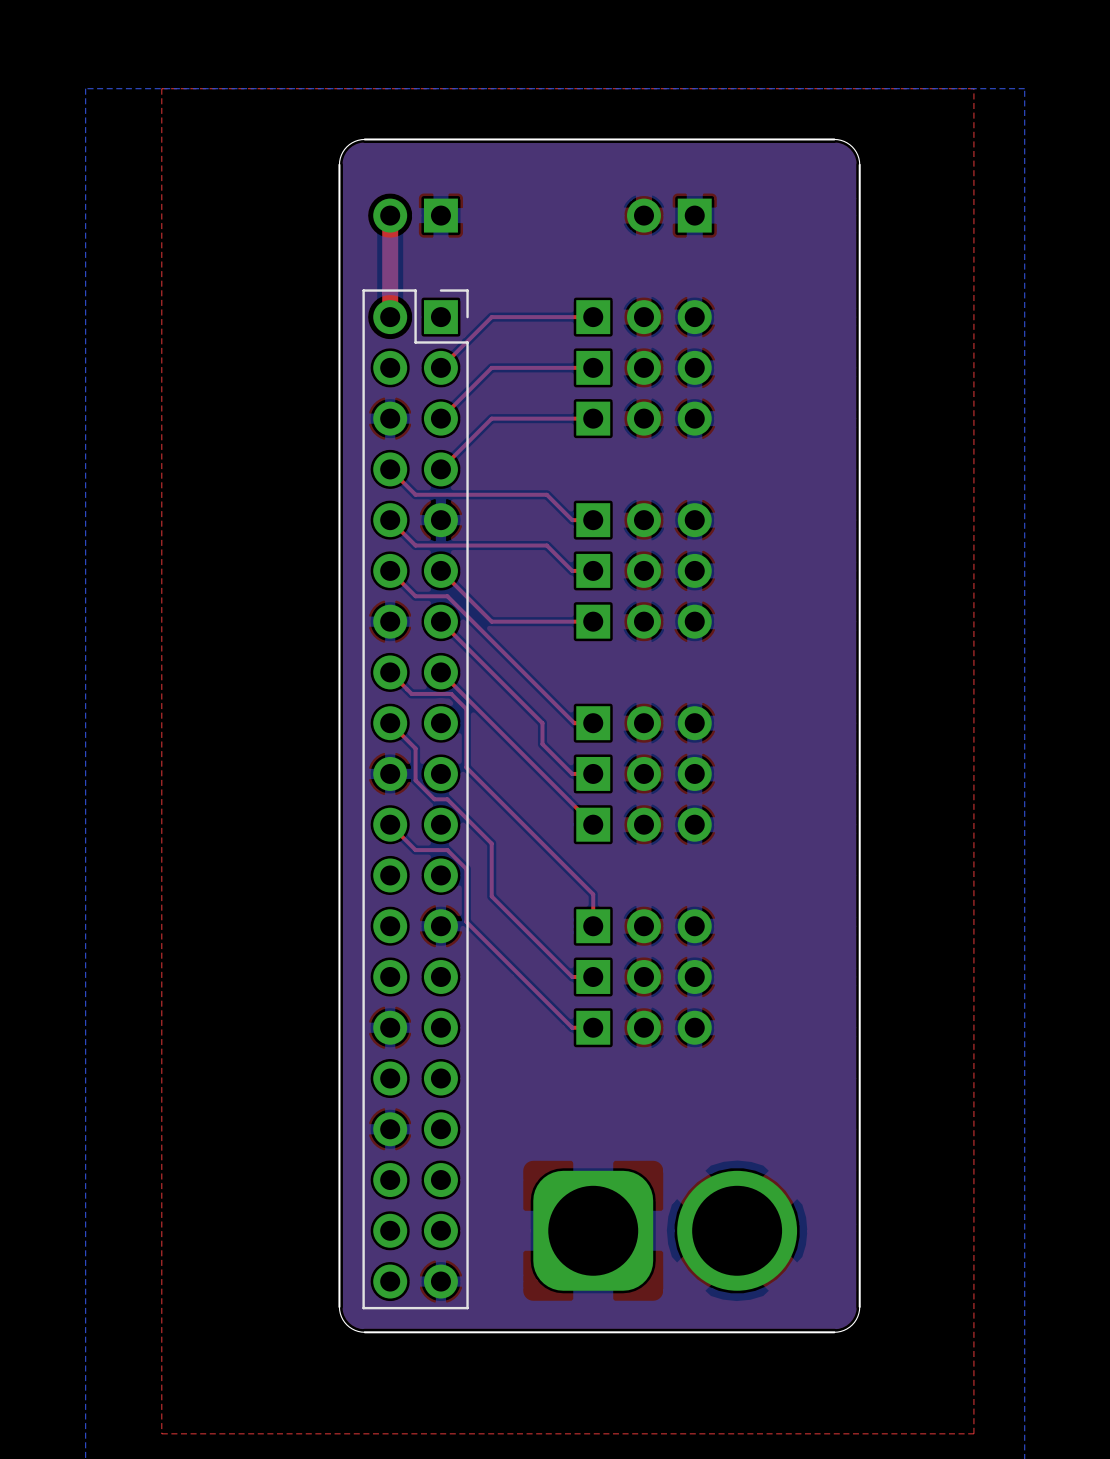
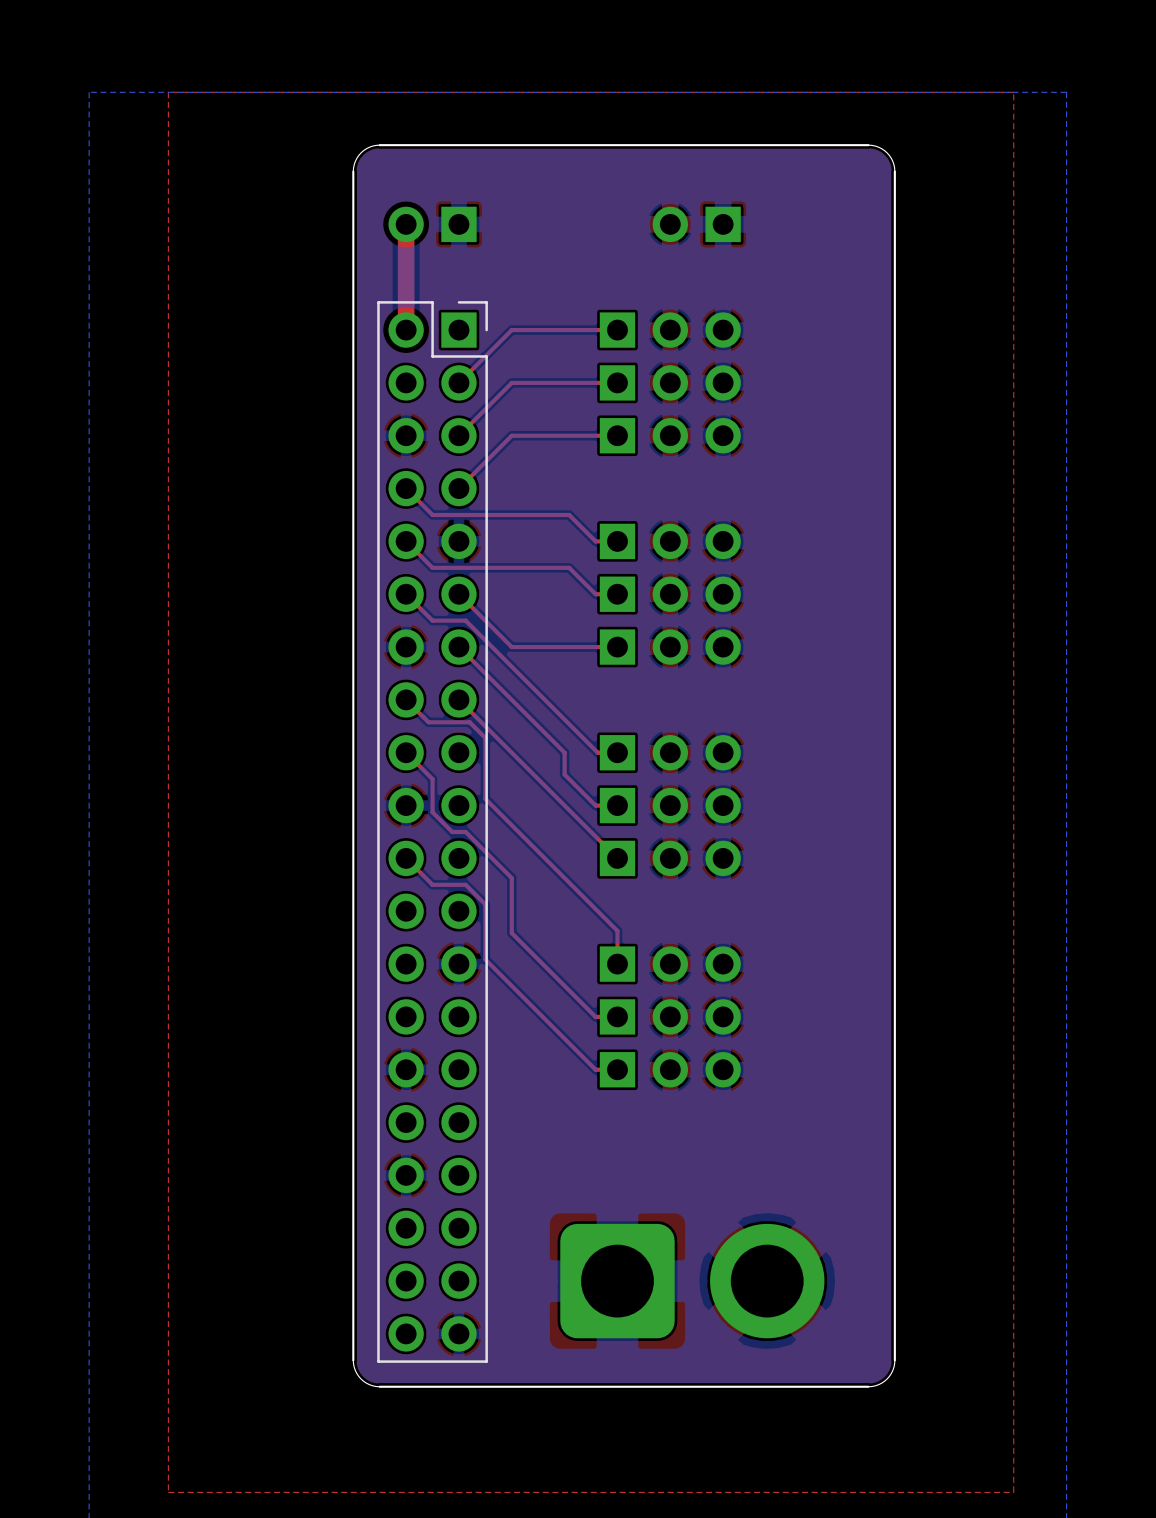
part footprint: [533, 1170, 798, 1291] -> [560, 1223, 825, 1339]

